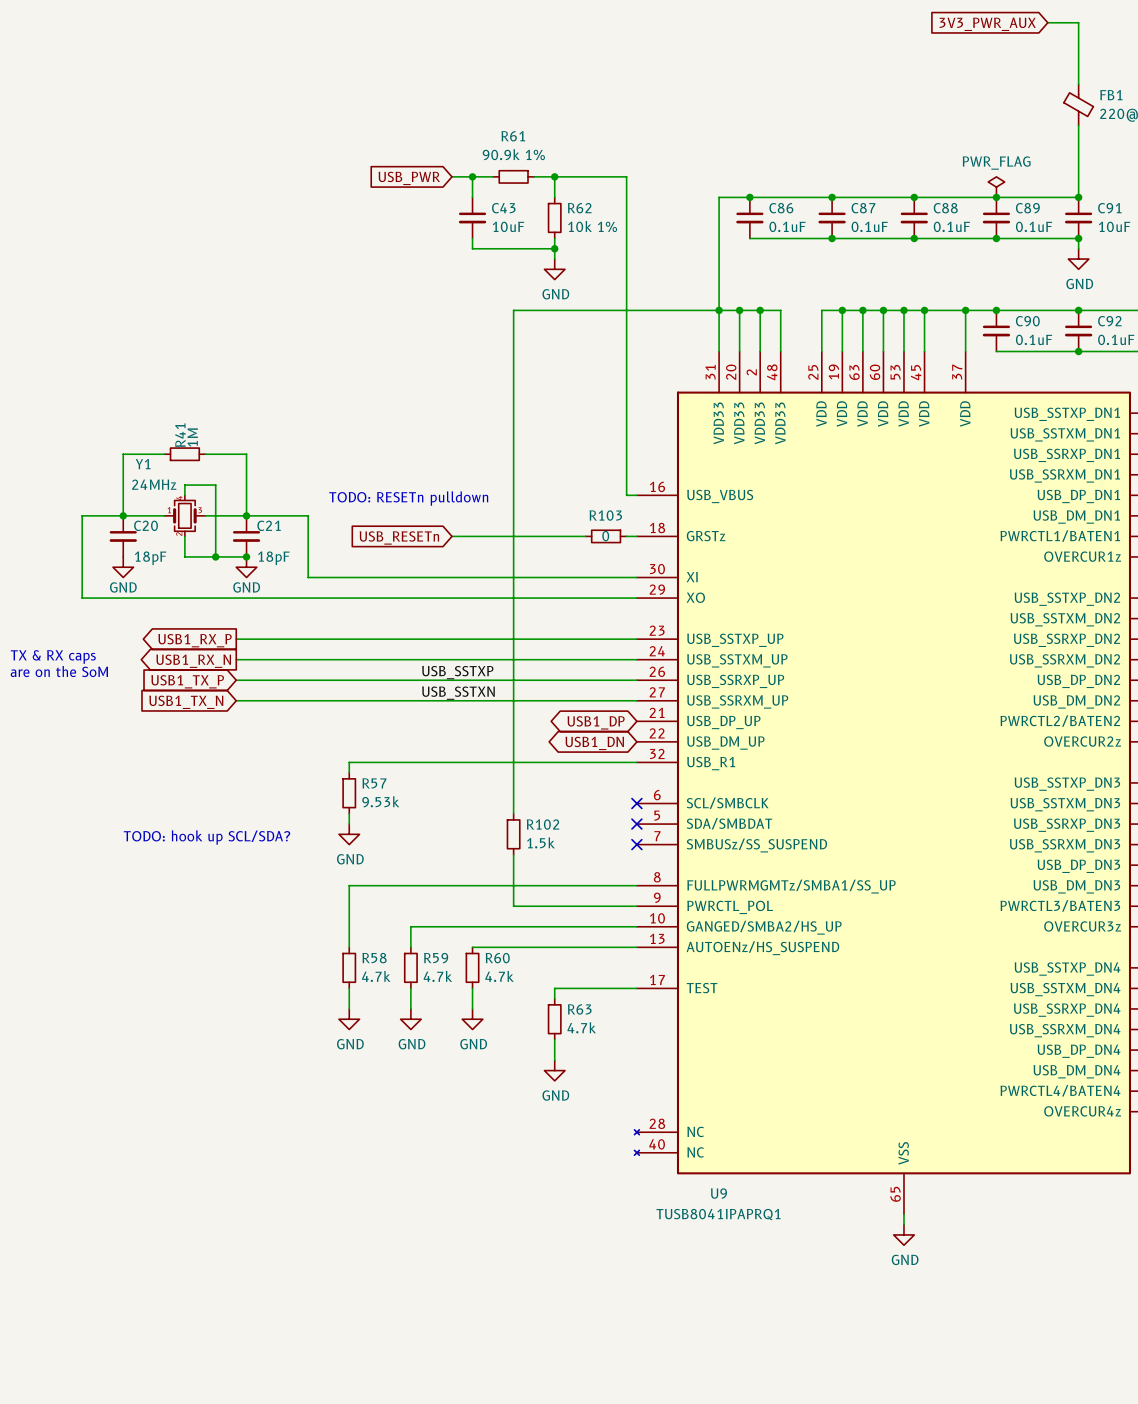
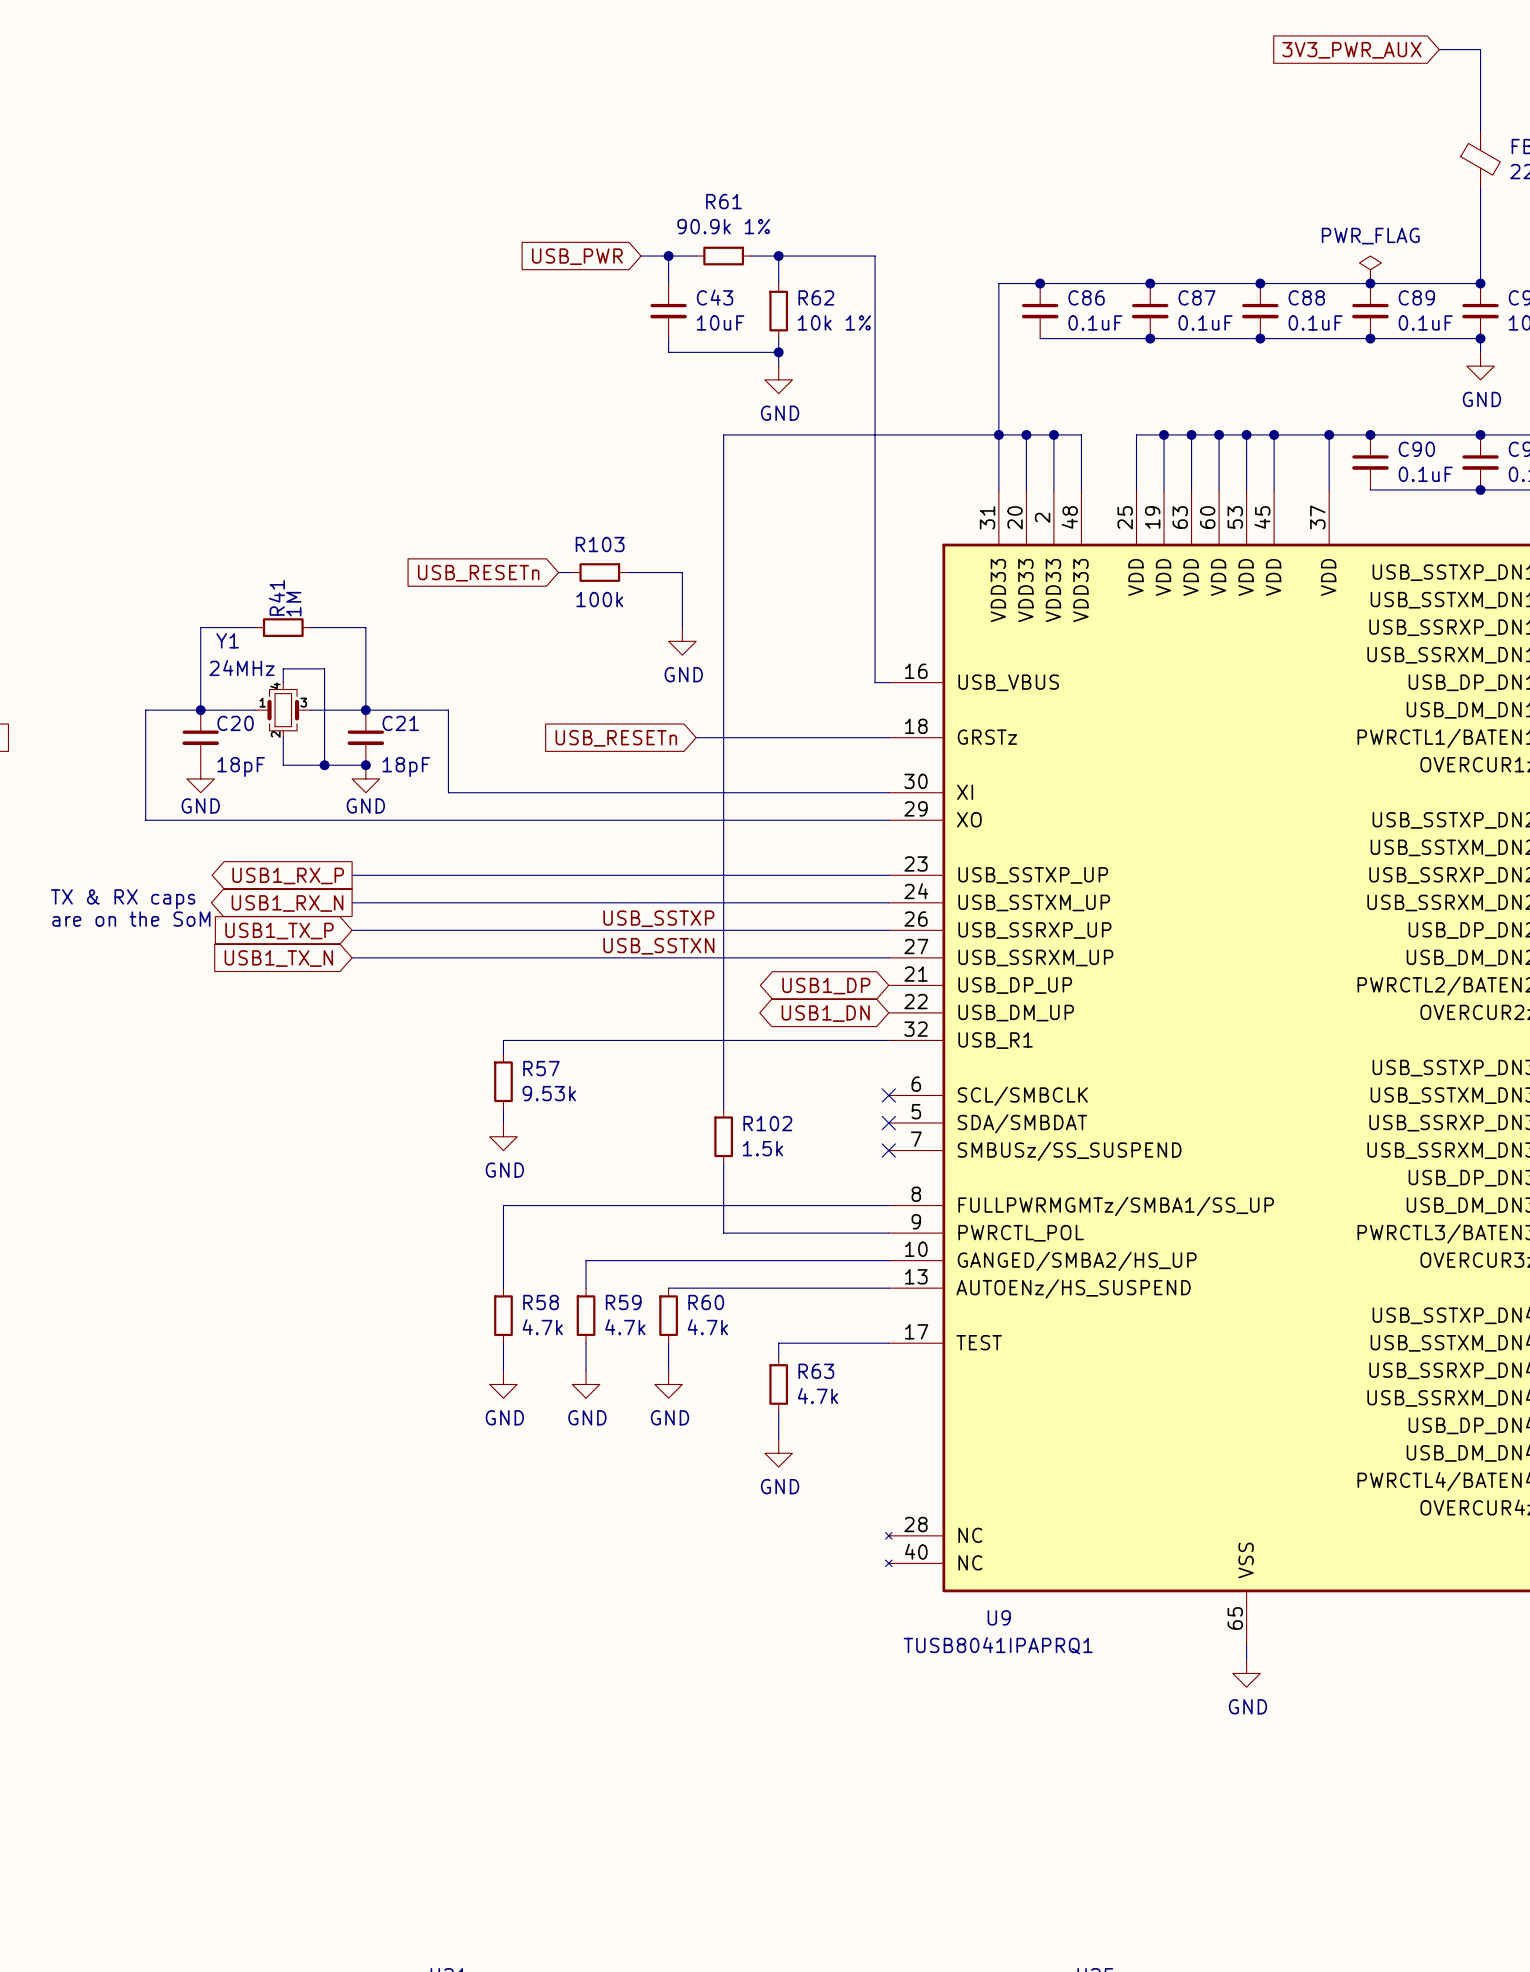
wire: none -> (558, 572) (572, 572)
wire: none -> (627, 572) (682, 572) (682, 627)
global label: none -> USB_RESETn (478, 573)
power symbol: none -> GND (682, 641)
text: TODO: RESETn pulldown (408, 498) -> none
wire: (451, 536) (493, 536) -> (819, 737) (875, 737)
R103 value: 0 (605, 536) -> 100k (599, 599)
R103 position: (606, 536) -> (599, 572)
global label position: USB_RESETn (399, 537) -> USB_RESETn (616, 738)
text: TODO: hook up SCL/SDA? (206, 837) -> none

